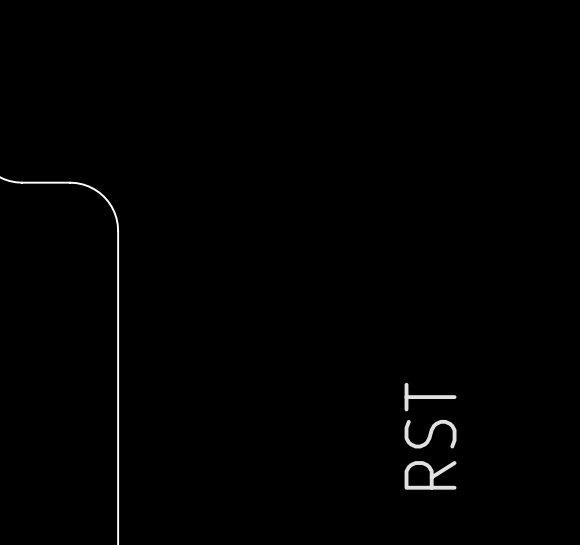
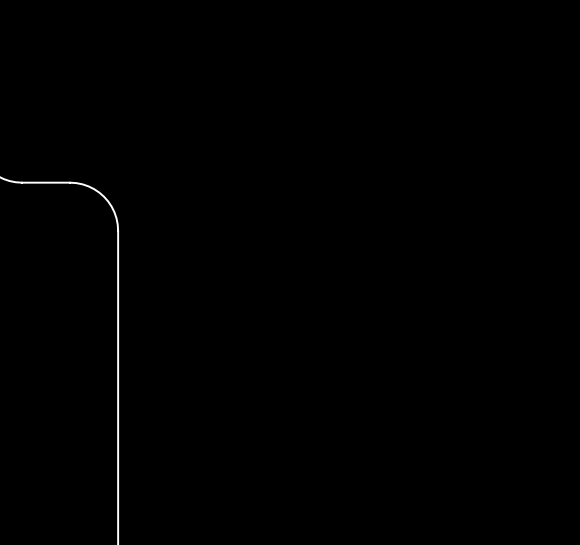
text: RST (430, 436) -> none

